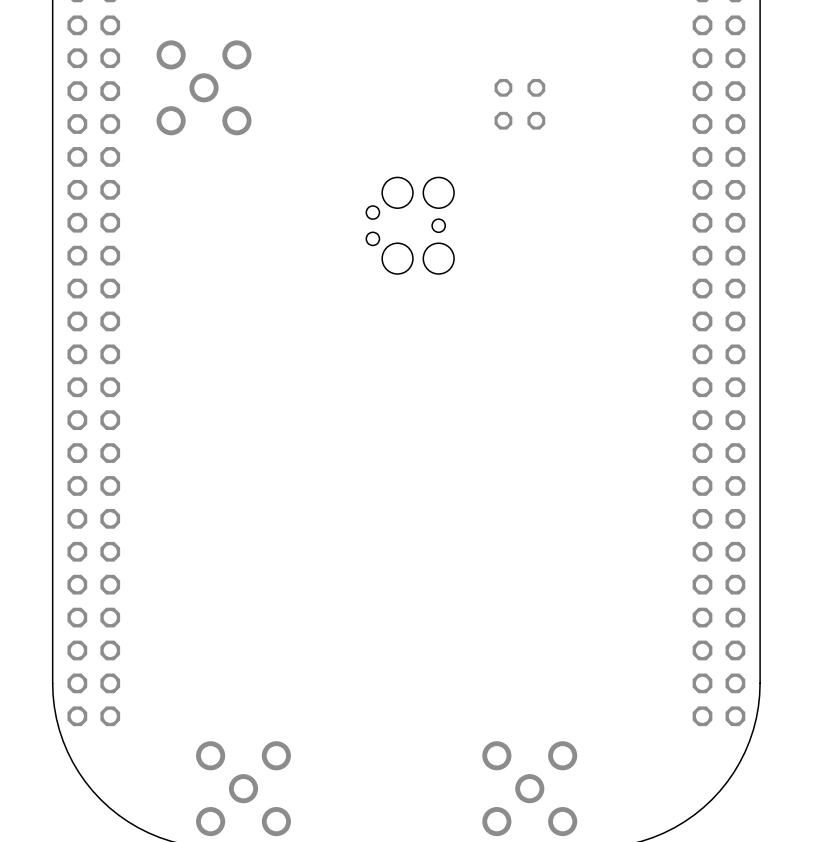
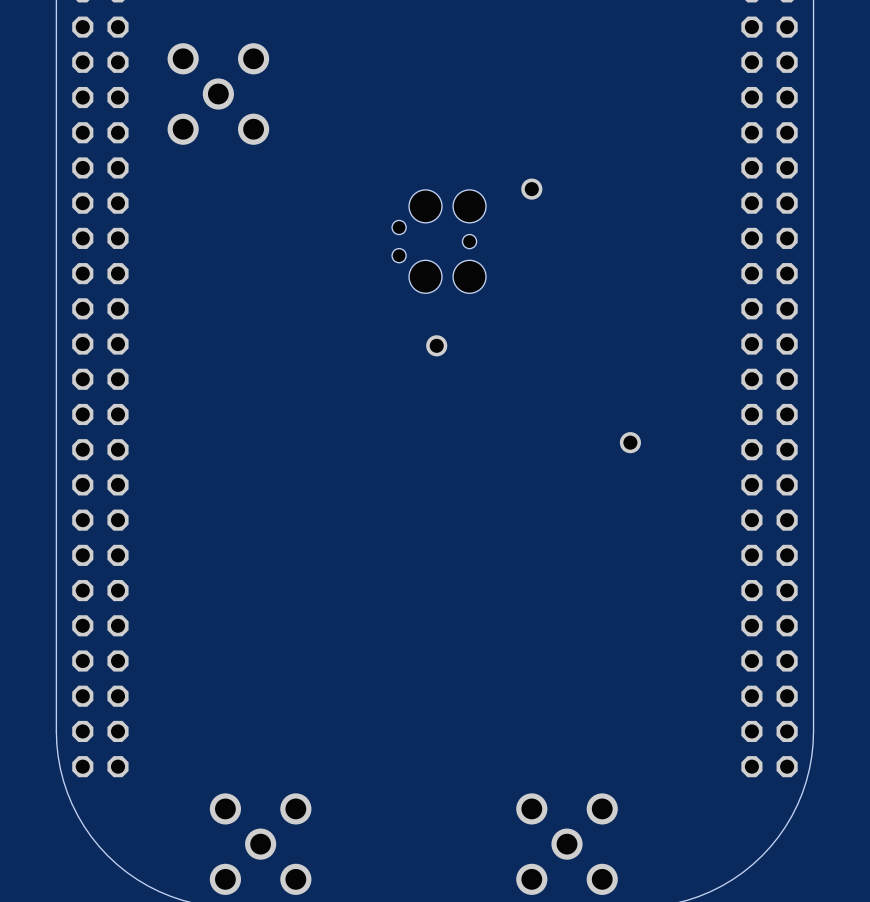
part: (519, 104) -> none
part: none -> (531, 189)
part: none -> (436, 345)
part: none -> (630, 442)

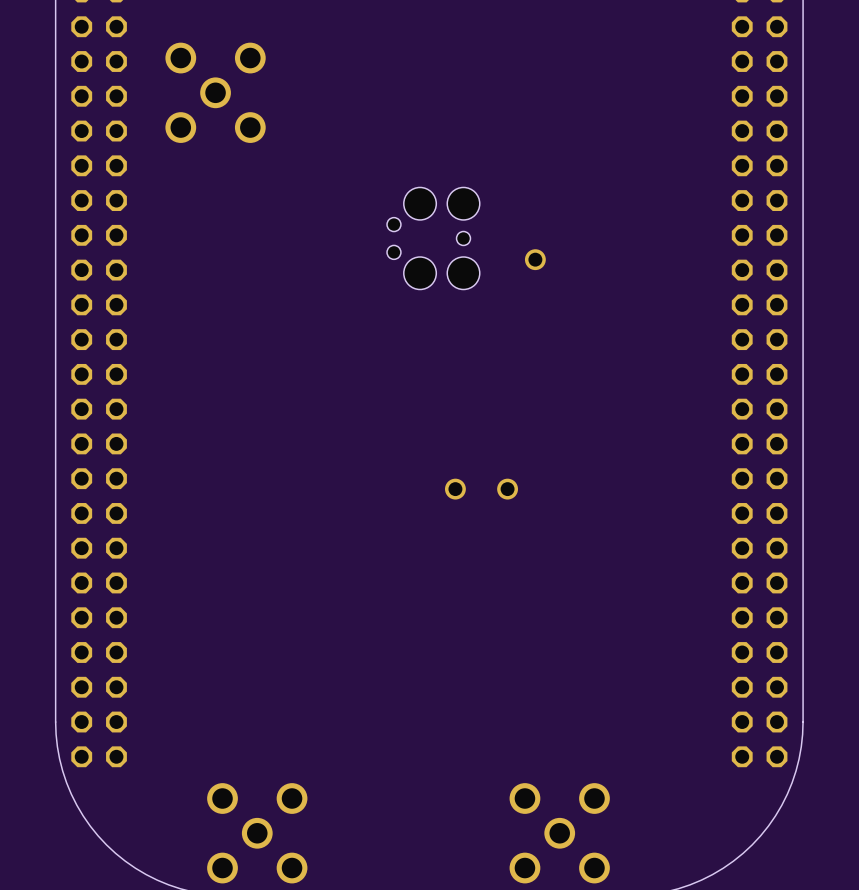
part: (531, 189) -> none
part: none -> (535, 259)
part: (436, 345) -> none
part: (630, 442) -> none
part: none -> (455, 489)
part: none -> (507, 489)

